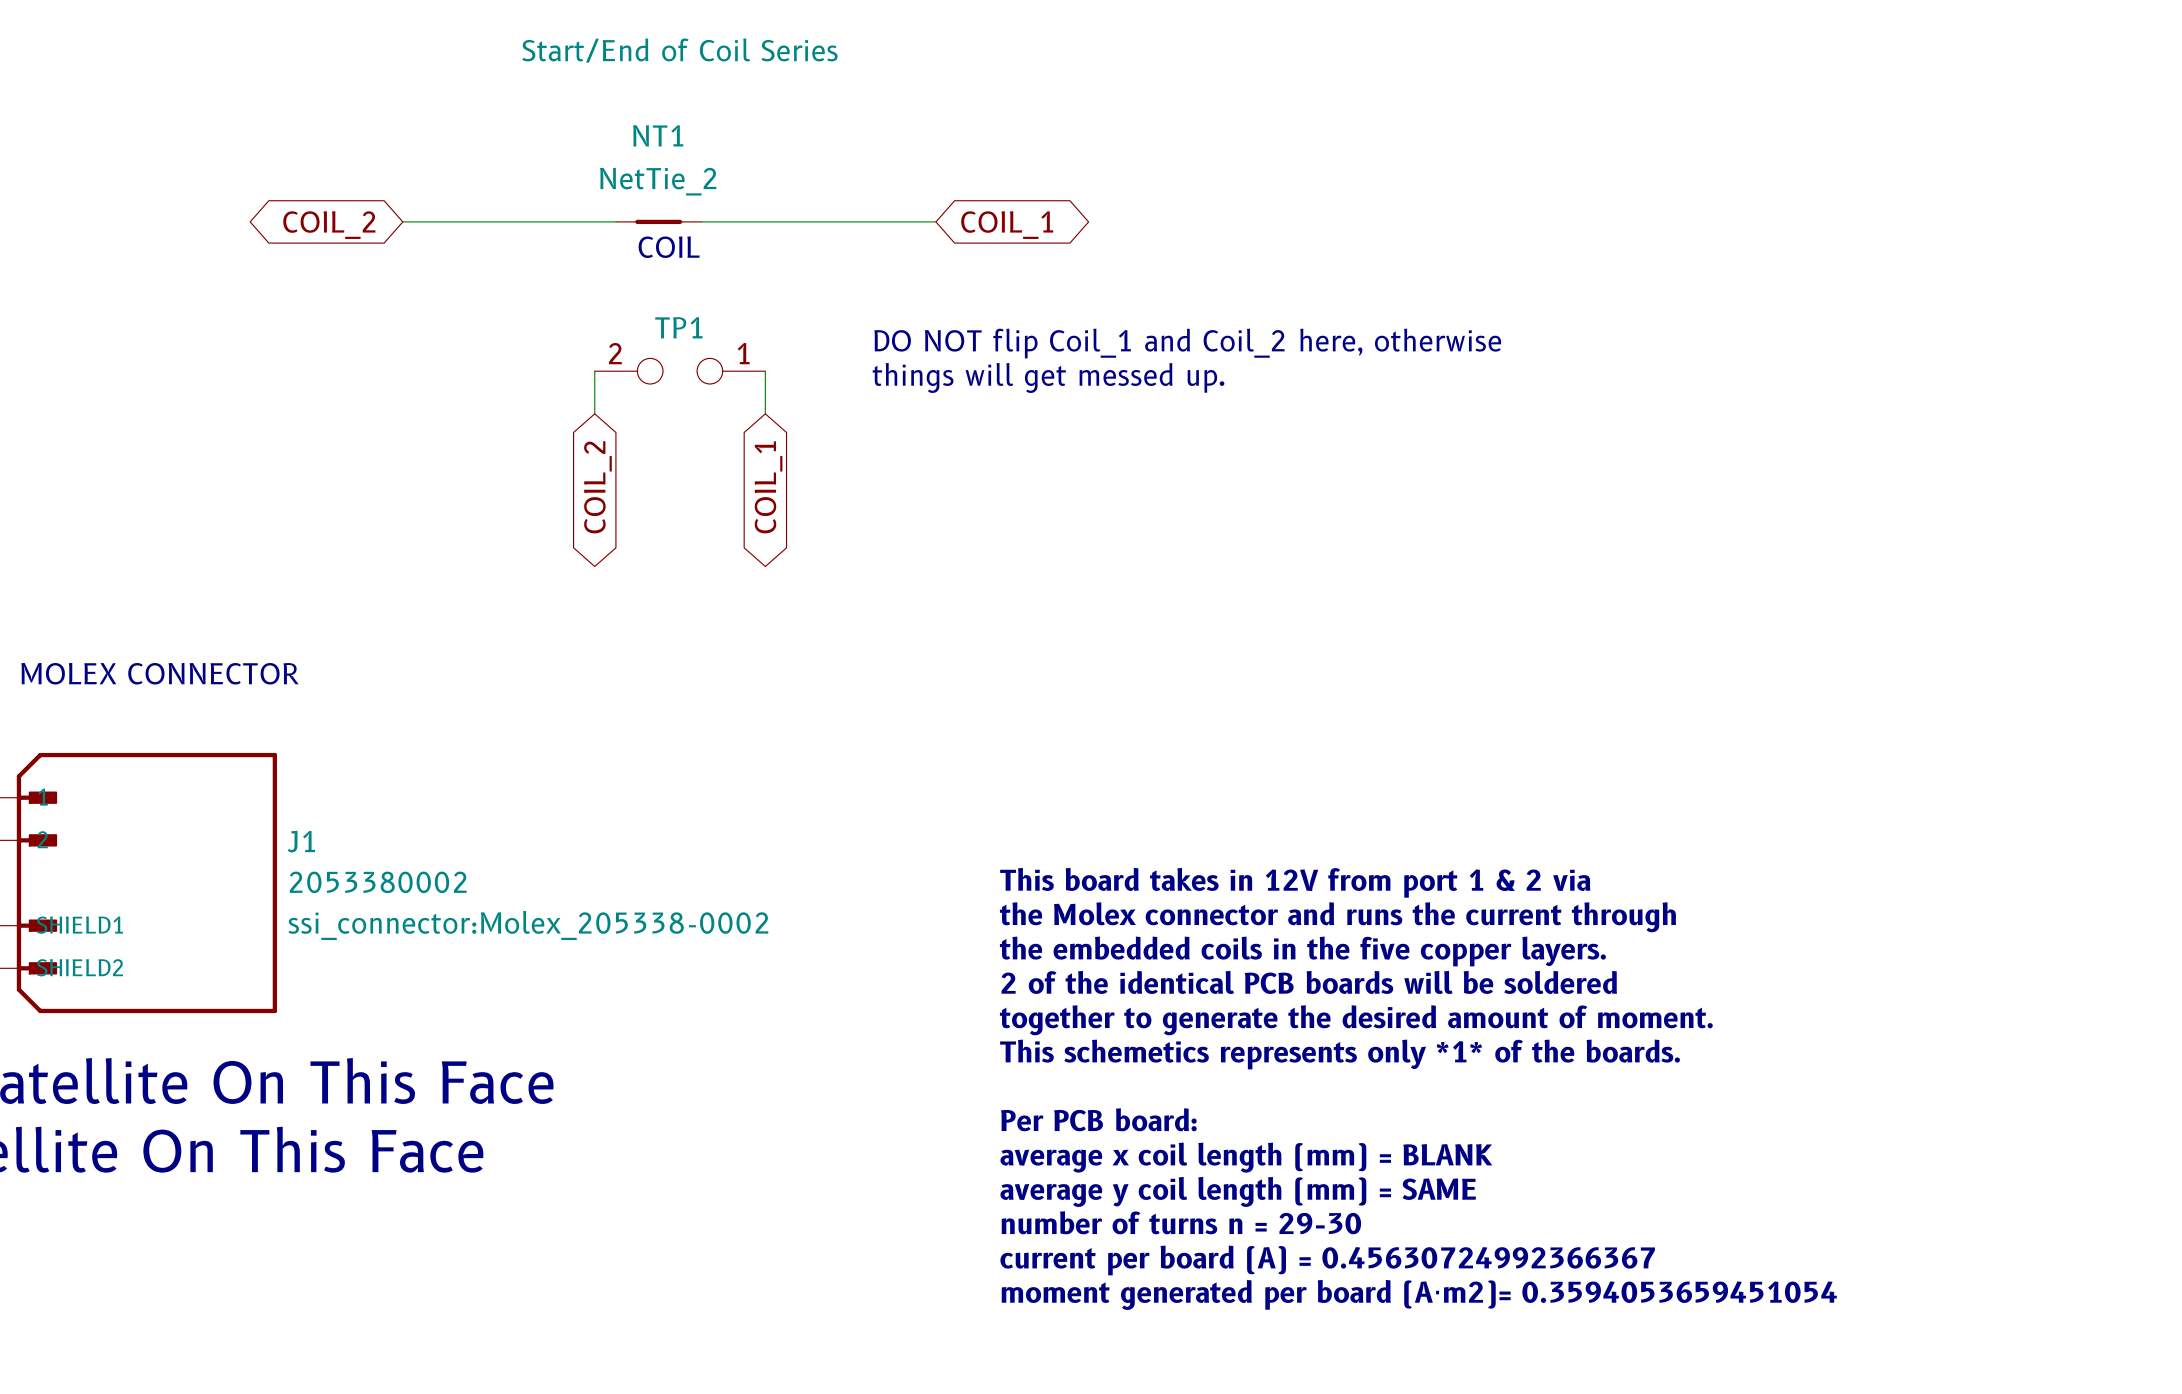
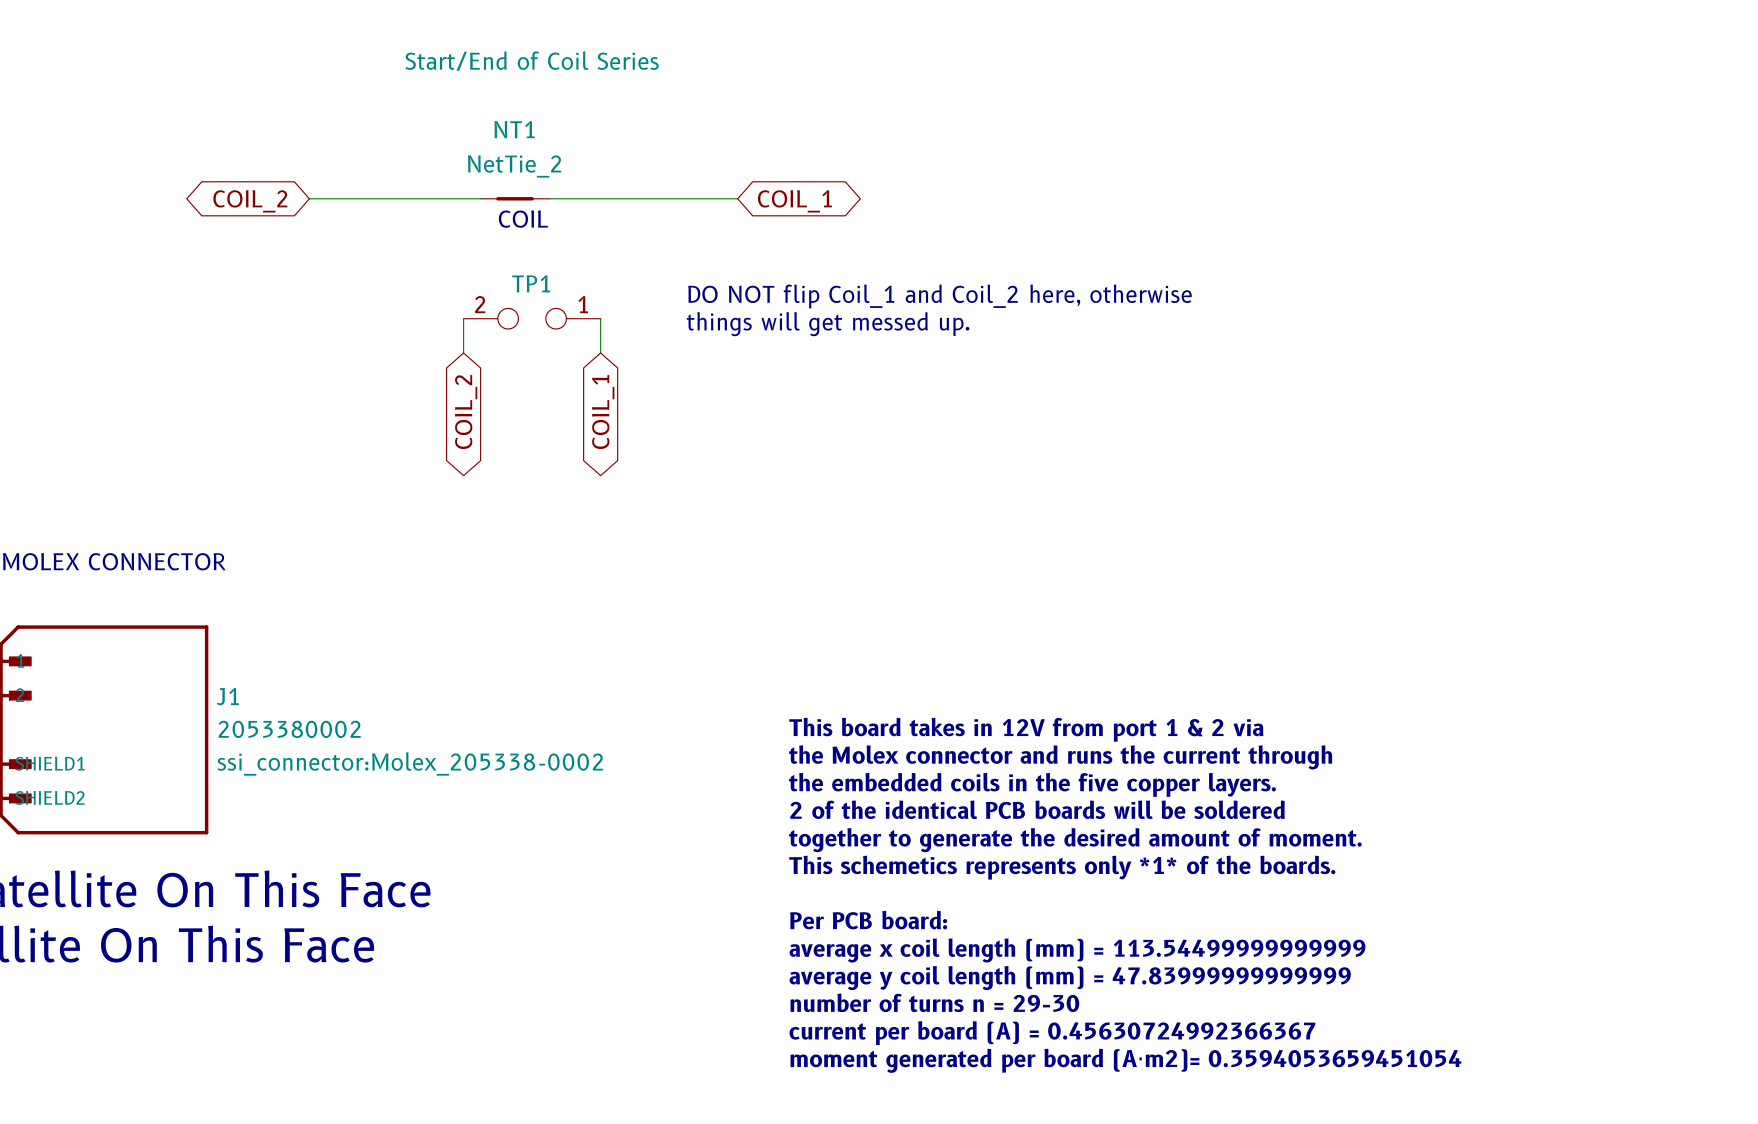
text: average x coil length (mm) = BLANK (1246, 1157) -> average x coil length (mm) = 113.54499999999999 (1077, 950)
text: average y coil length (mm) = SAME (1238, 1191) -> average y coil length (mm) = 47.83999999999999 (1070, 978)

